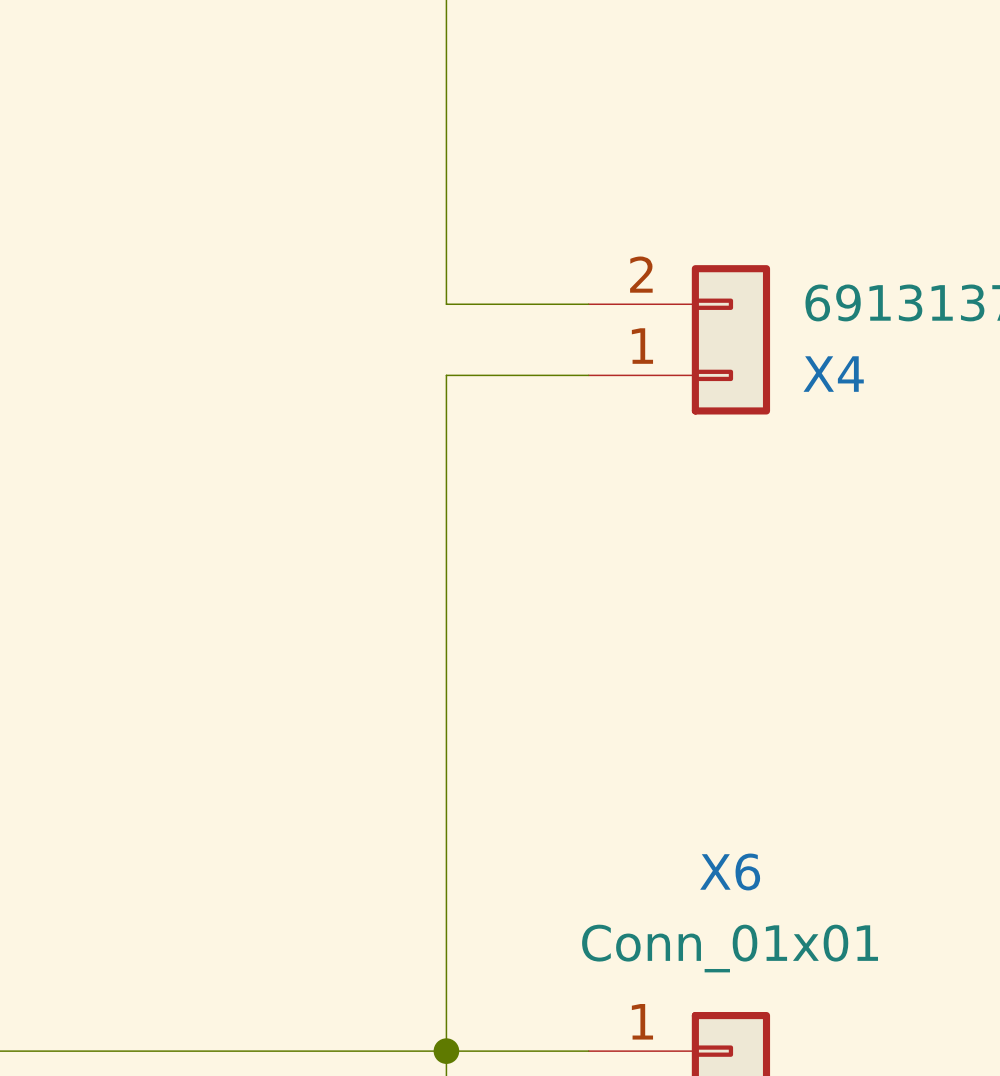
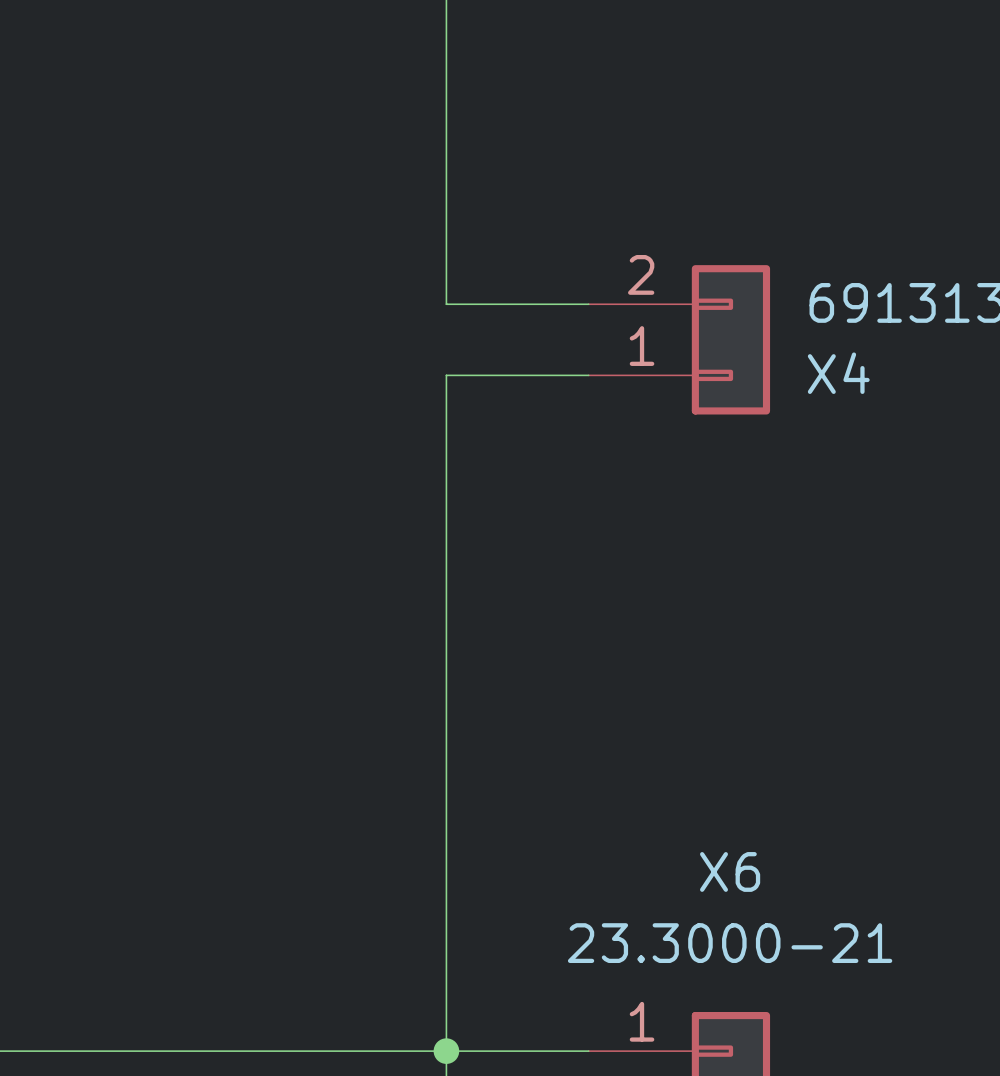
X6 value: Conn_01x01 (730, 948) -> 23.3000-21 (730, 943)

